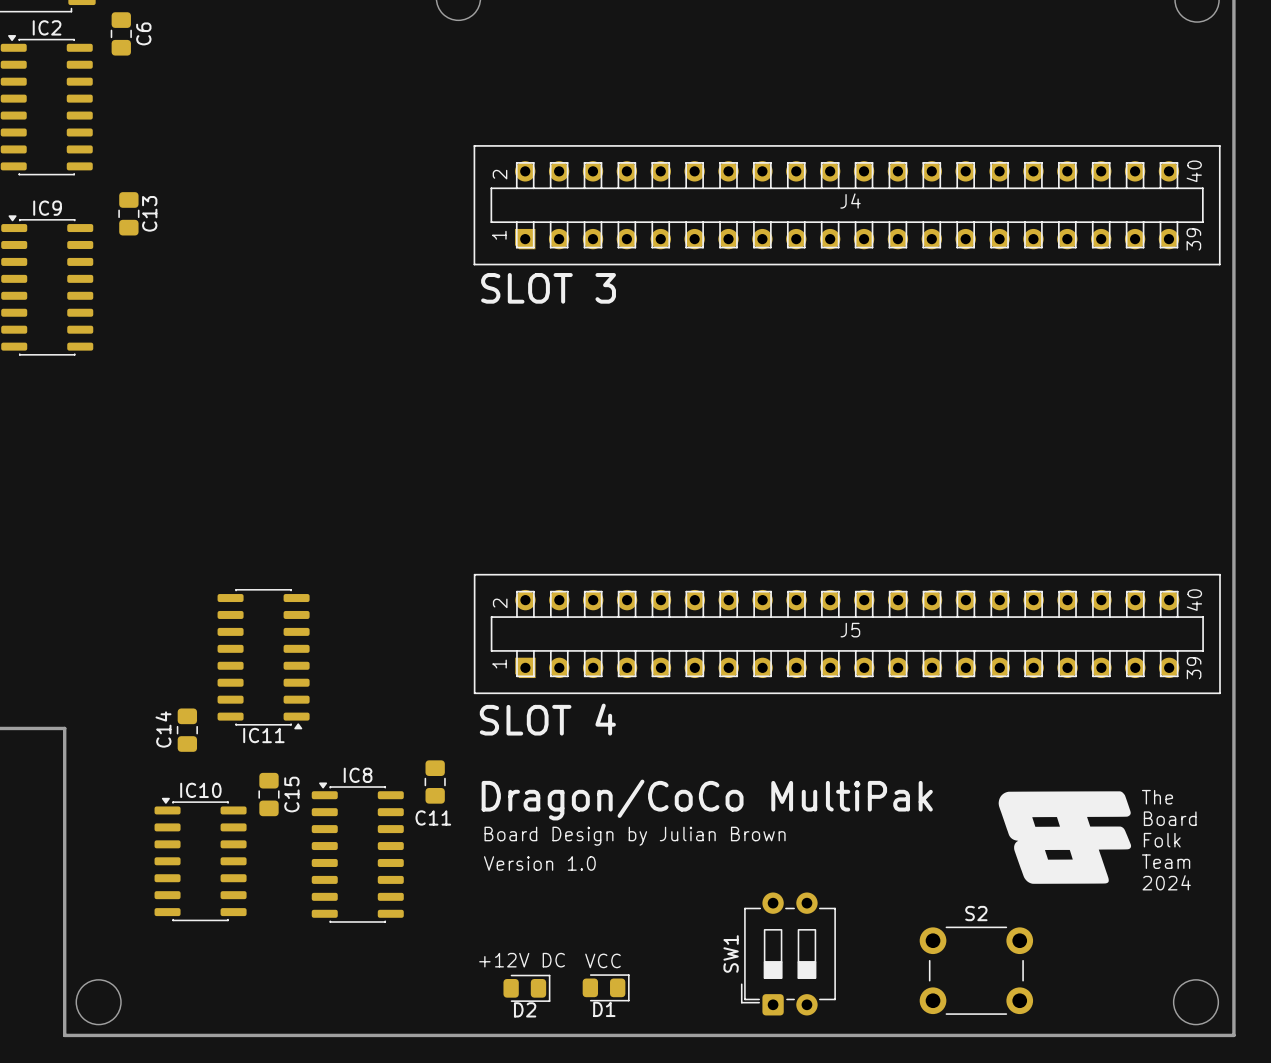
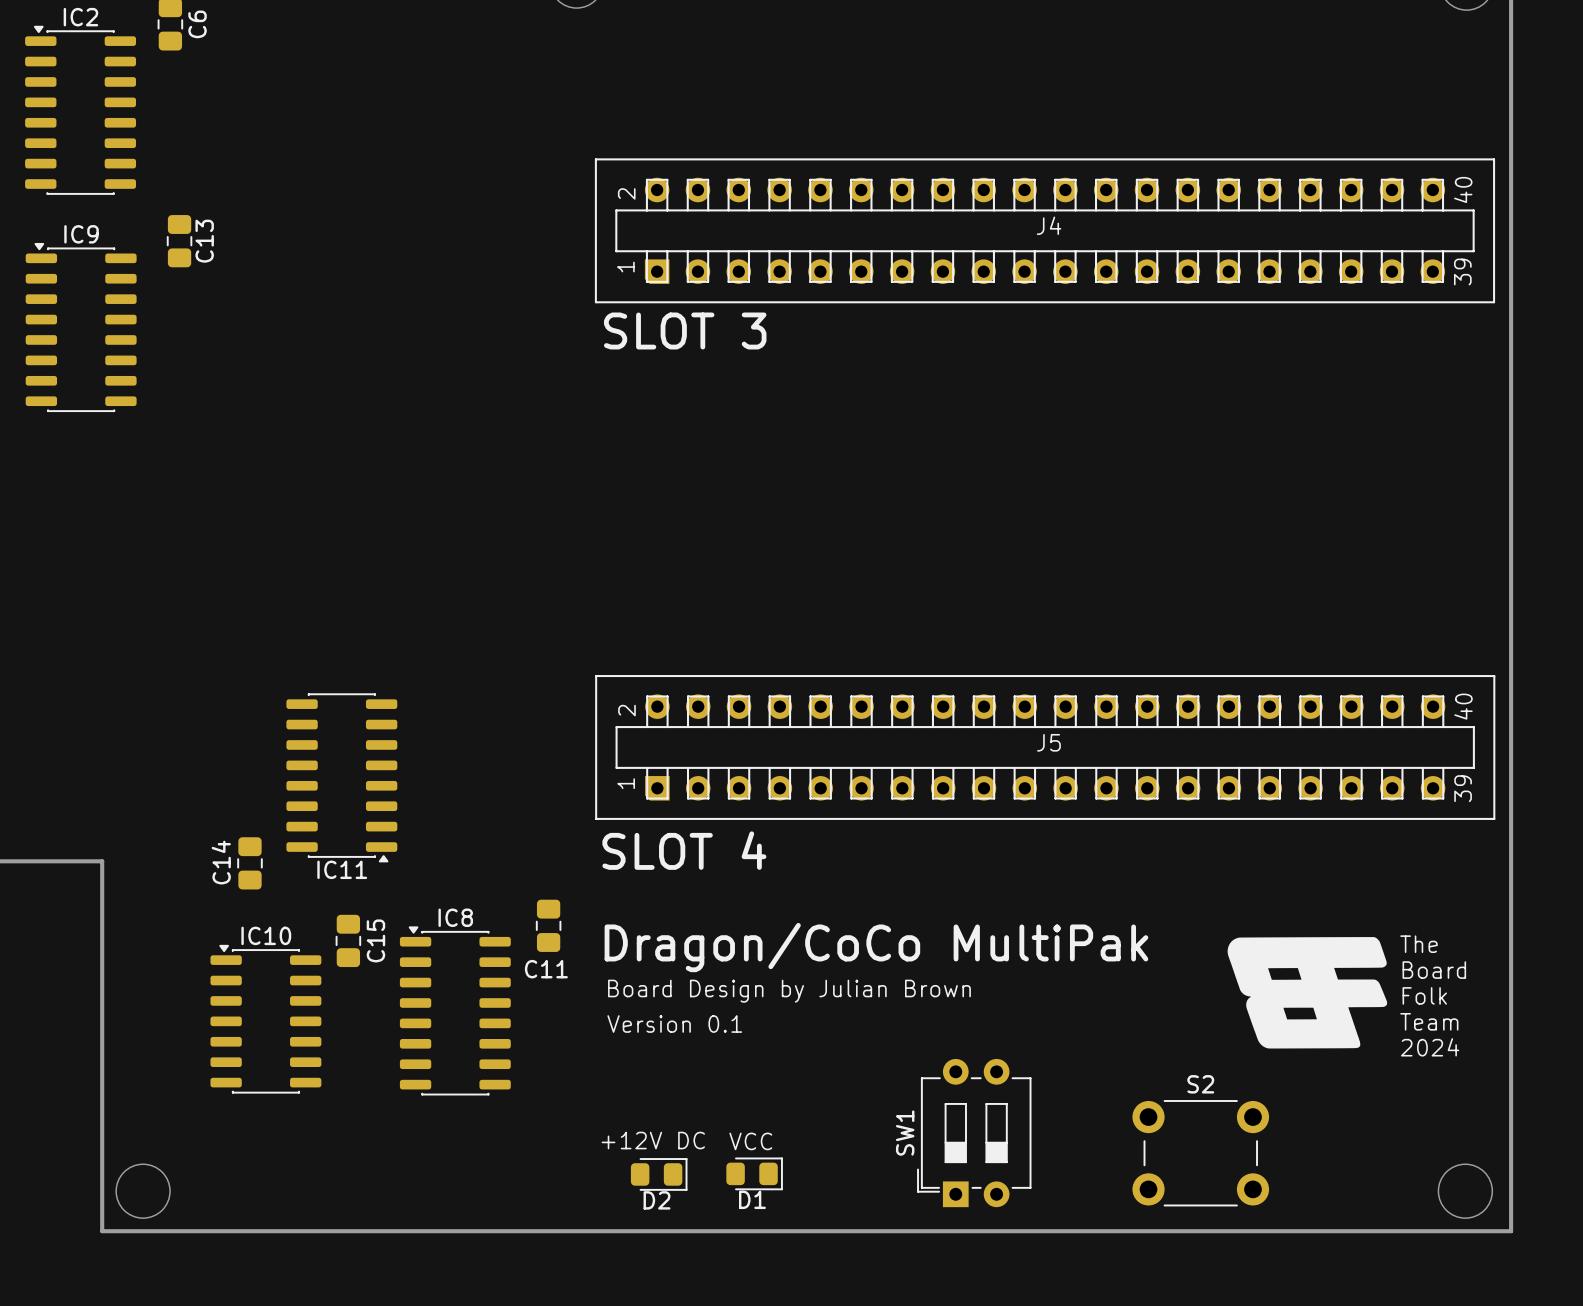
text: Version 1.0 (539, 863) -> Version 0.1 (674, 1024)
SW1 footprint: [740, 892, 836, 1016] -> [917, 1058, 1032, 1208]

